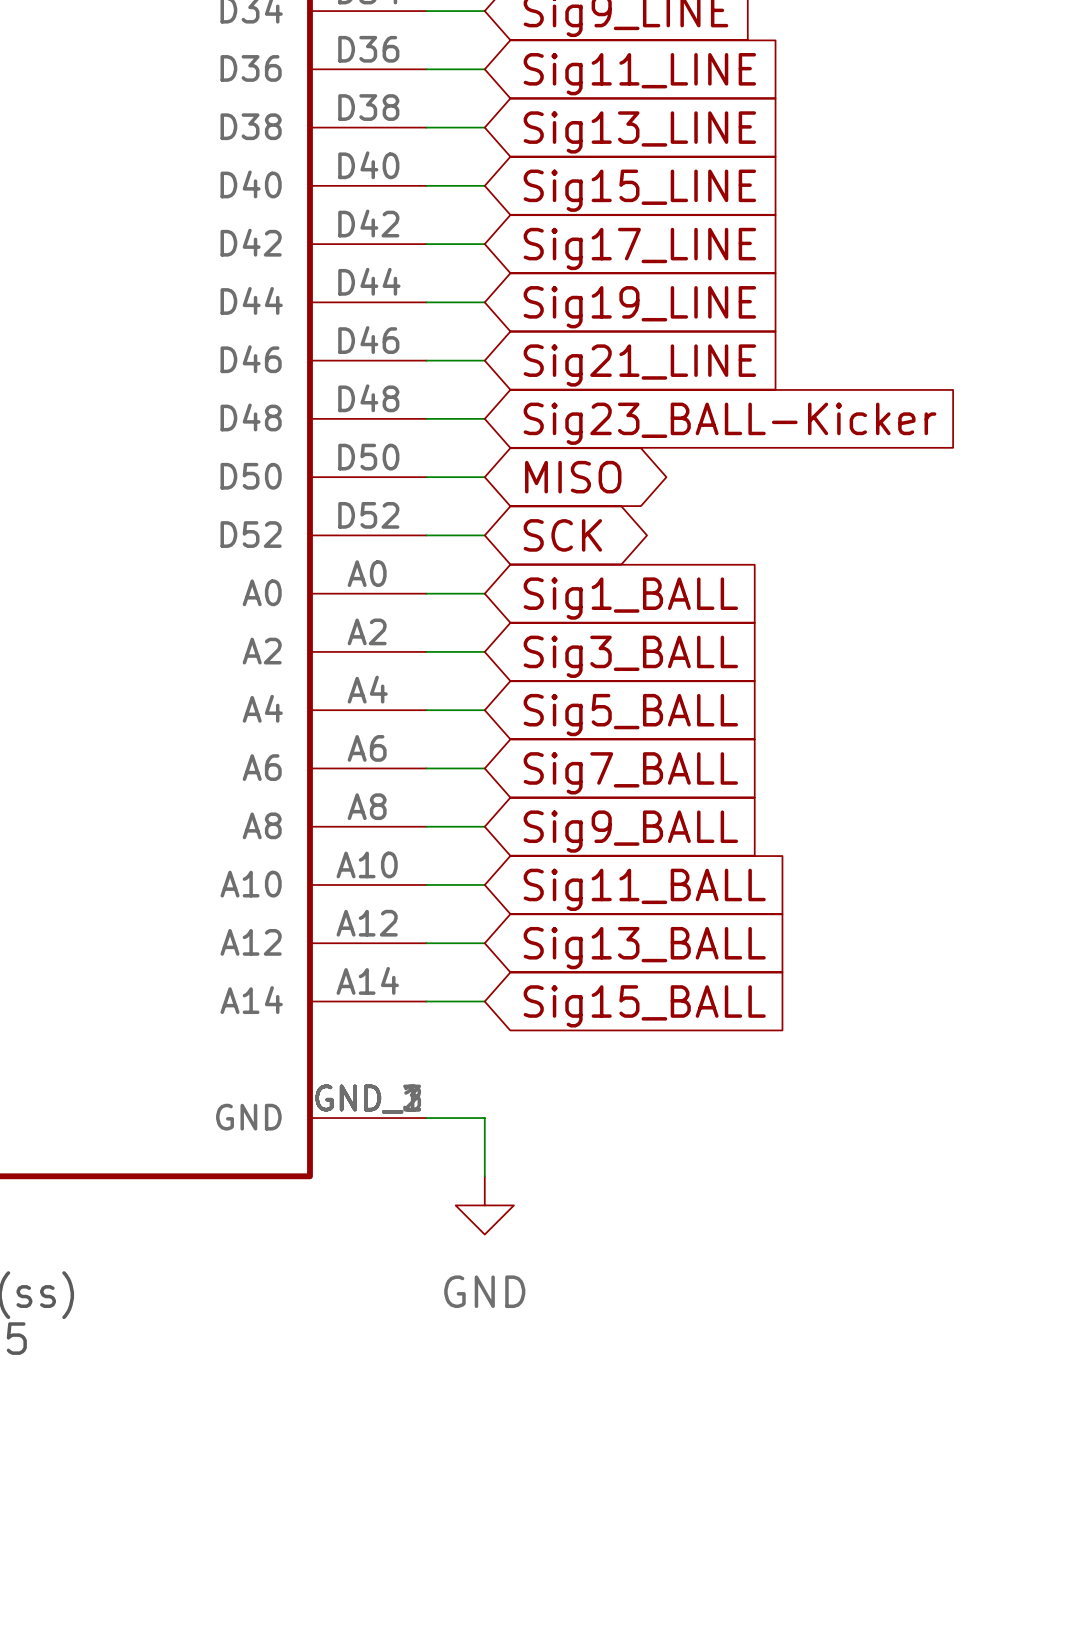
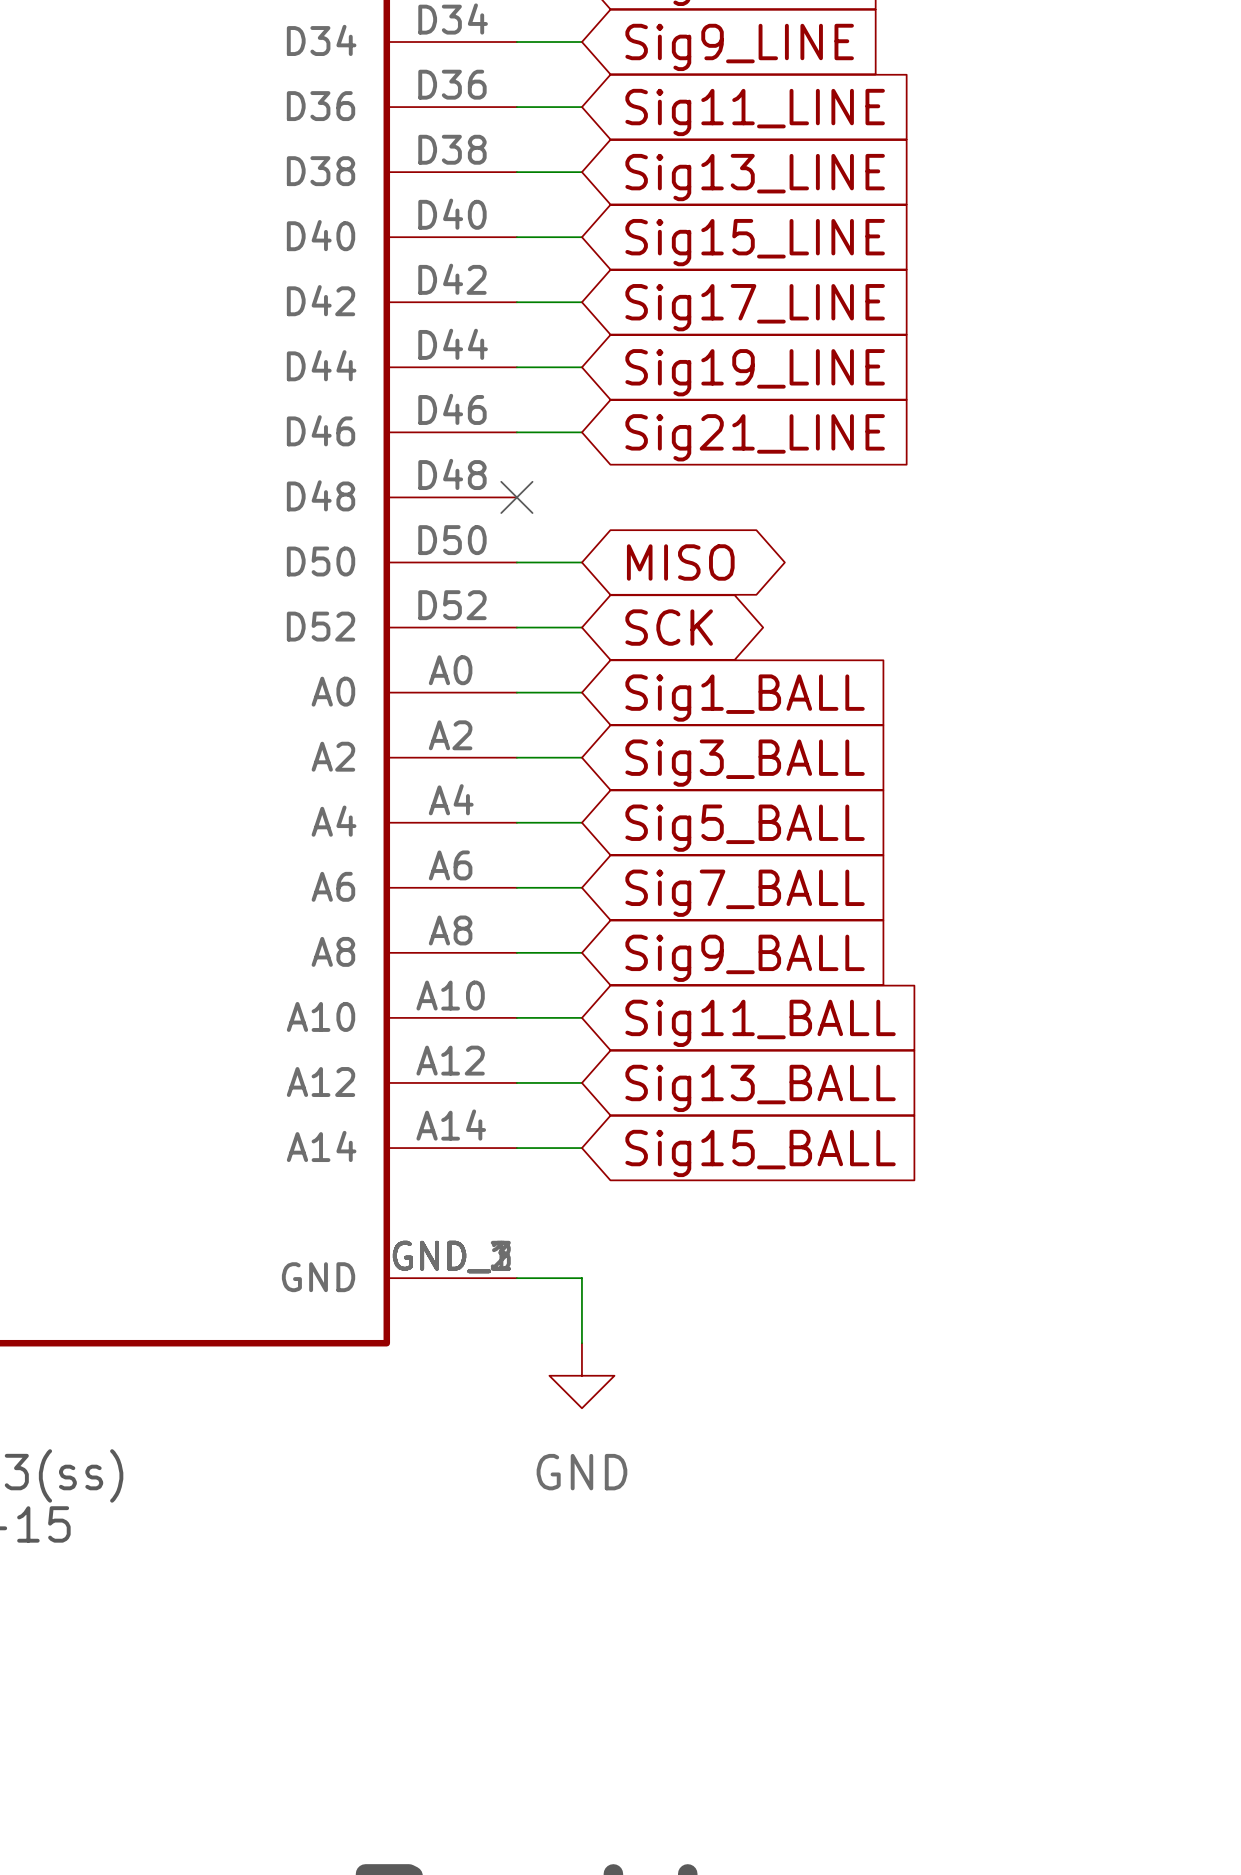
wire: (426, 418) (484, 418) -> none
no-connect mark: none -> (516, 497)
global label: Sig23_BALL-Kicker (730, 423) -> none

